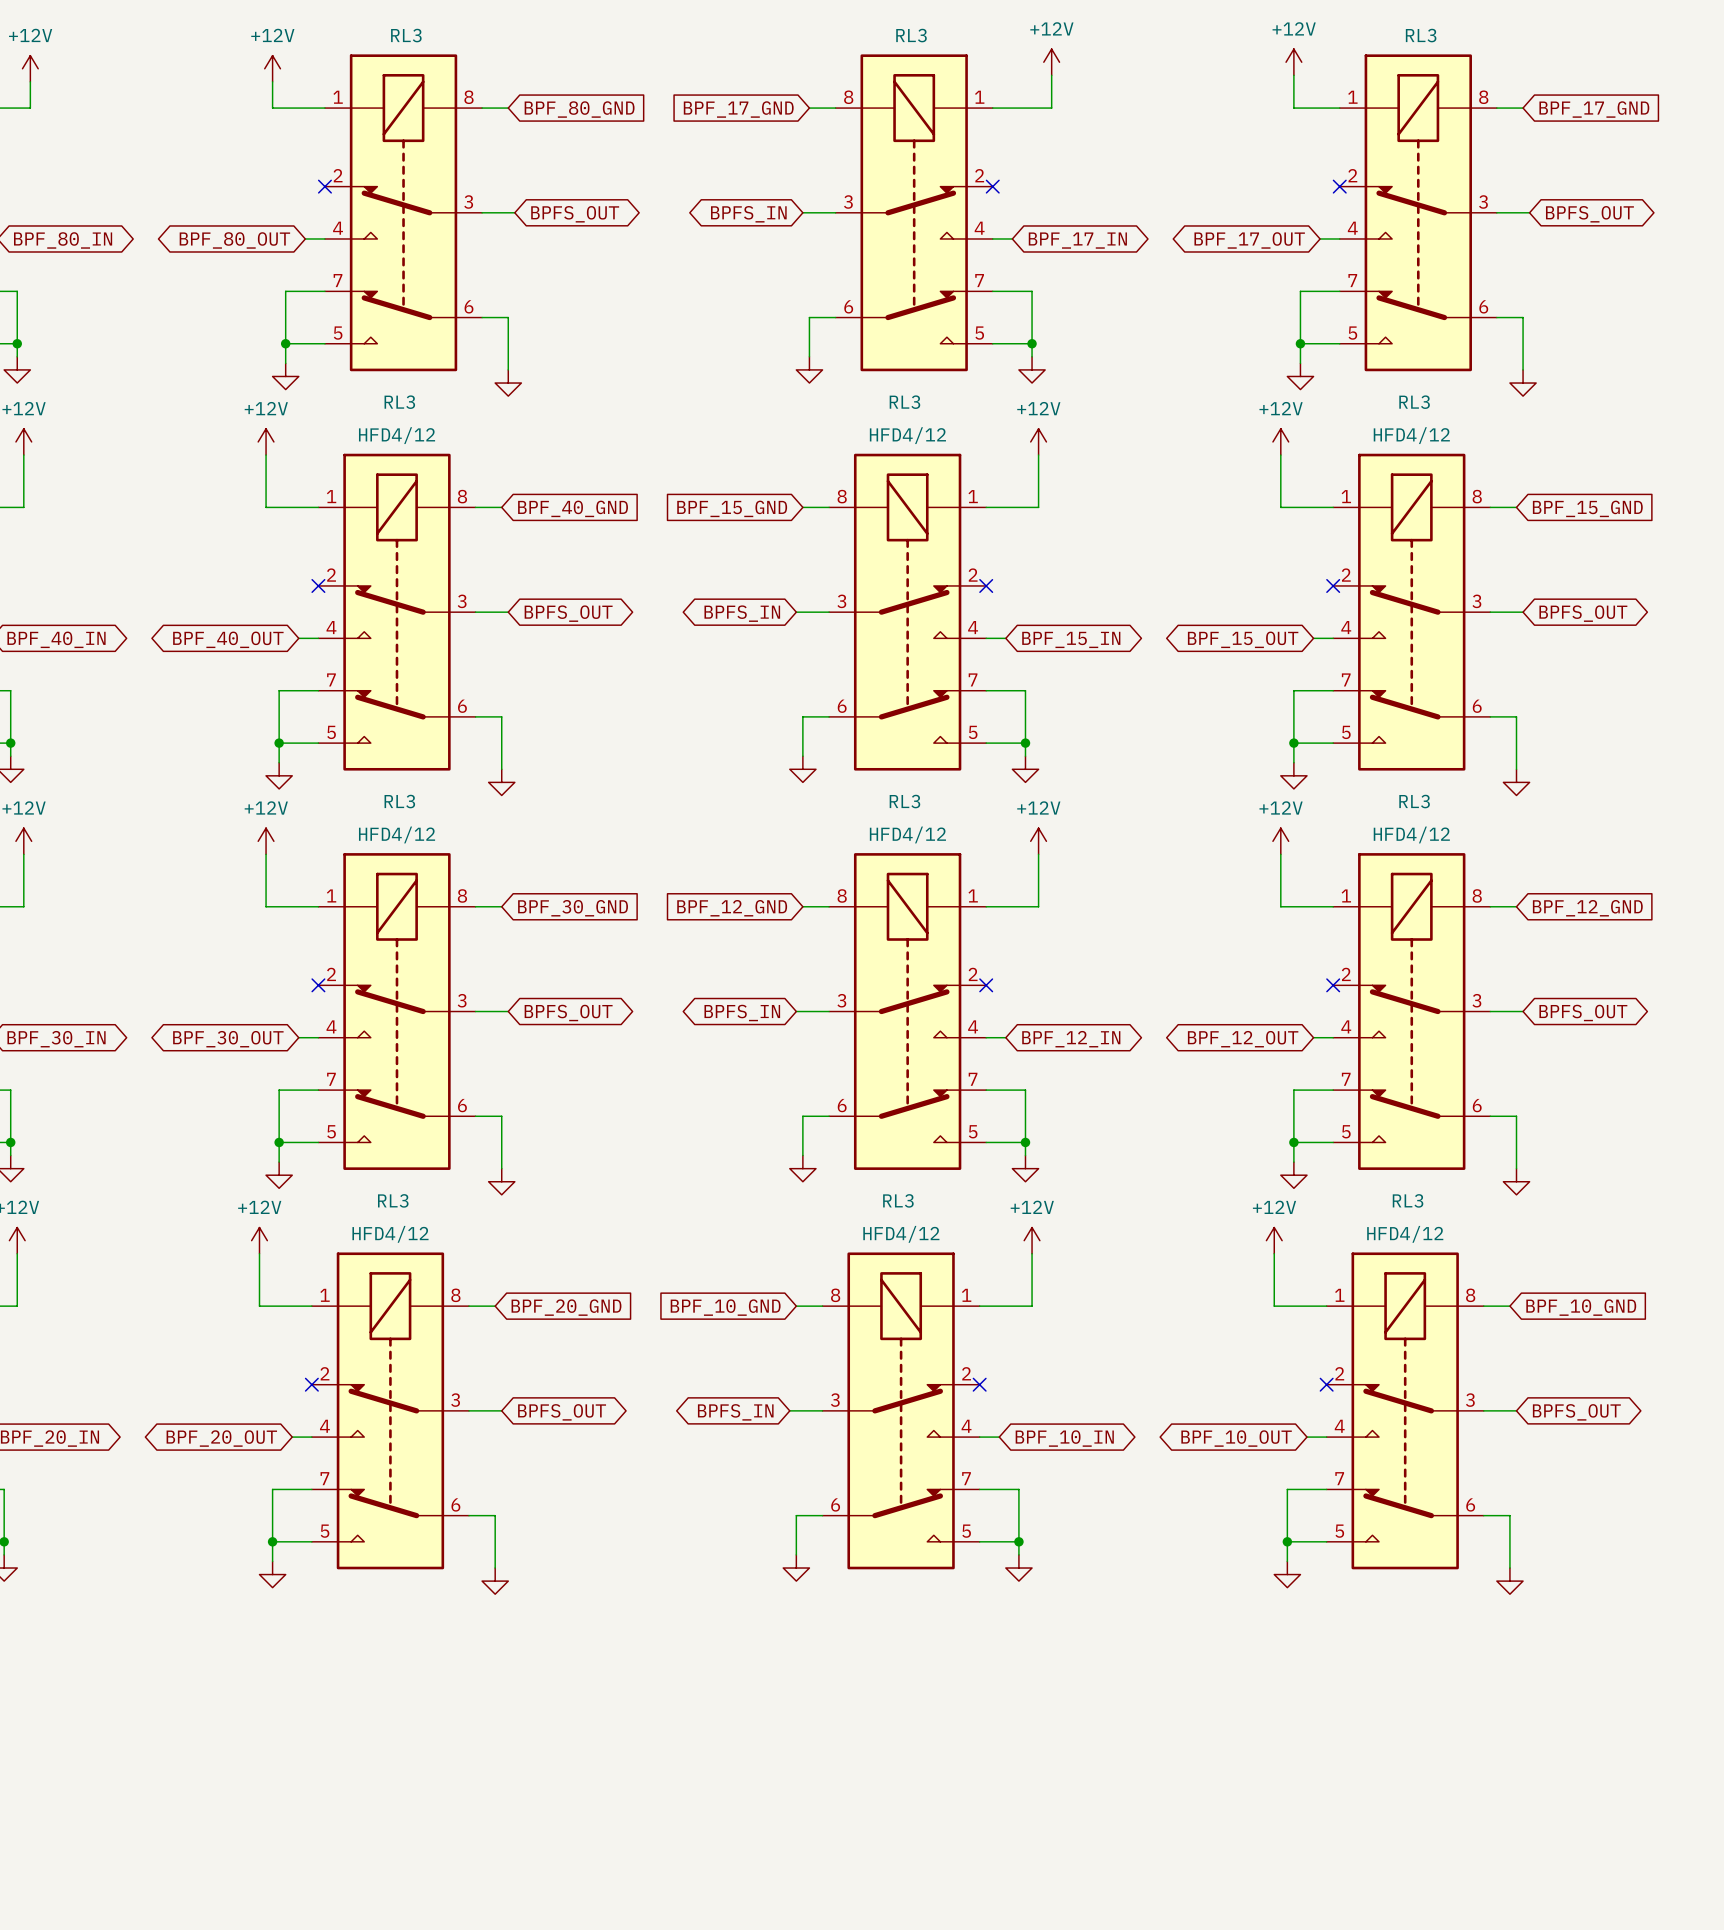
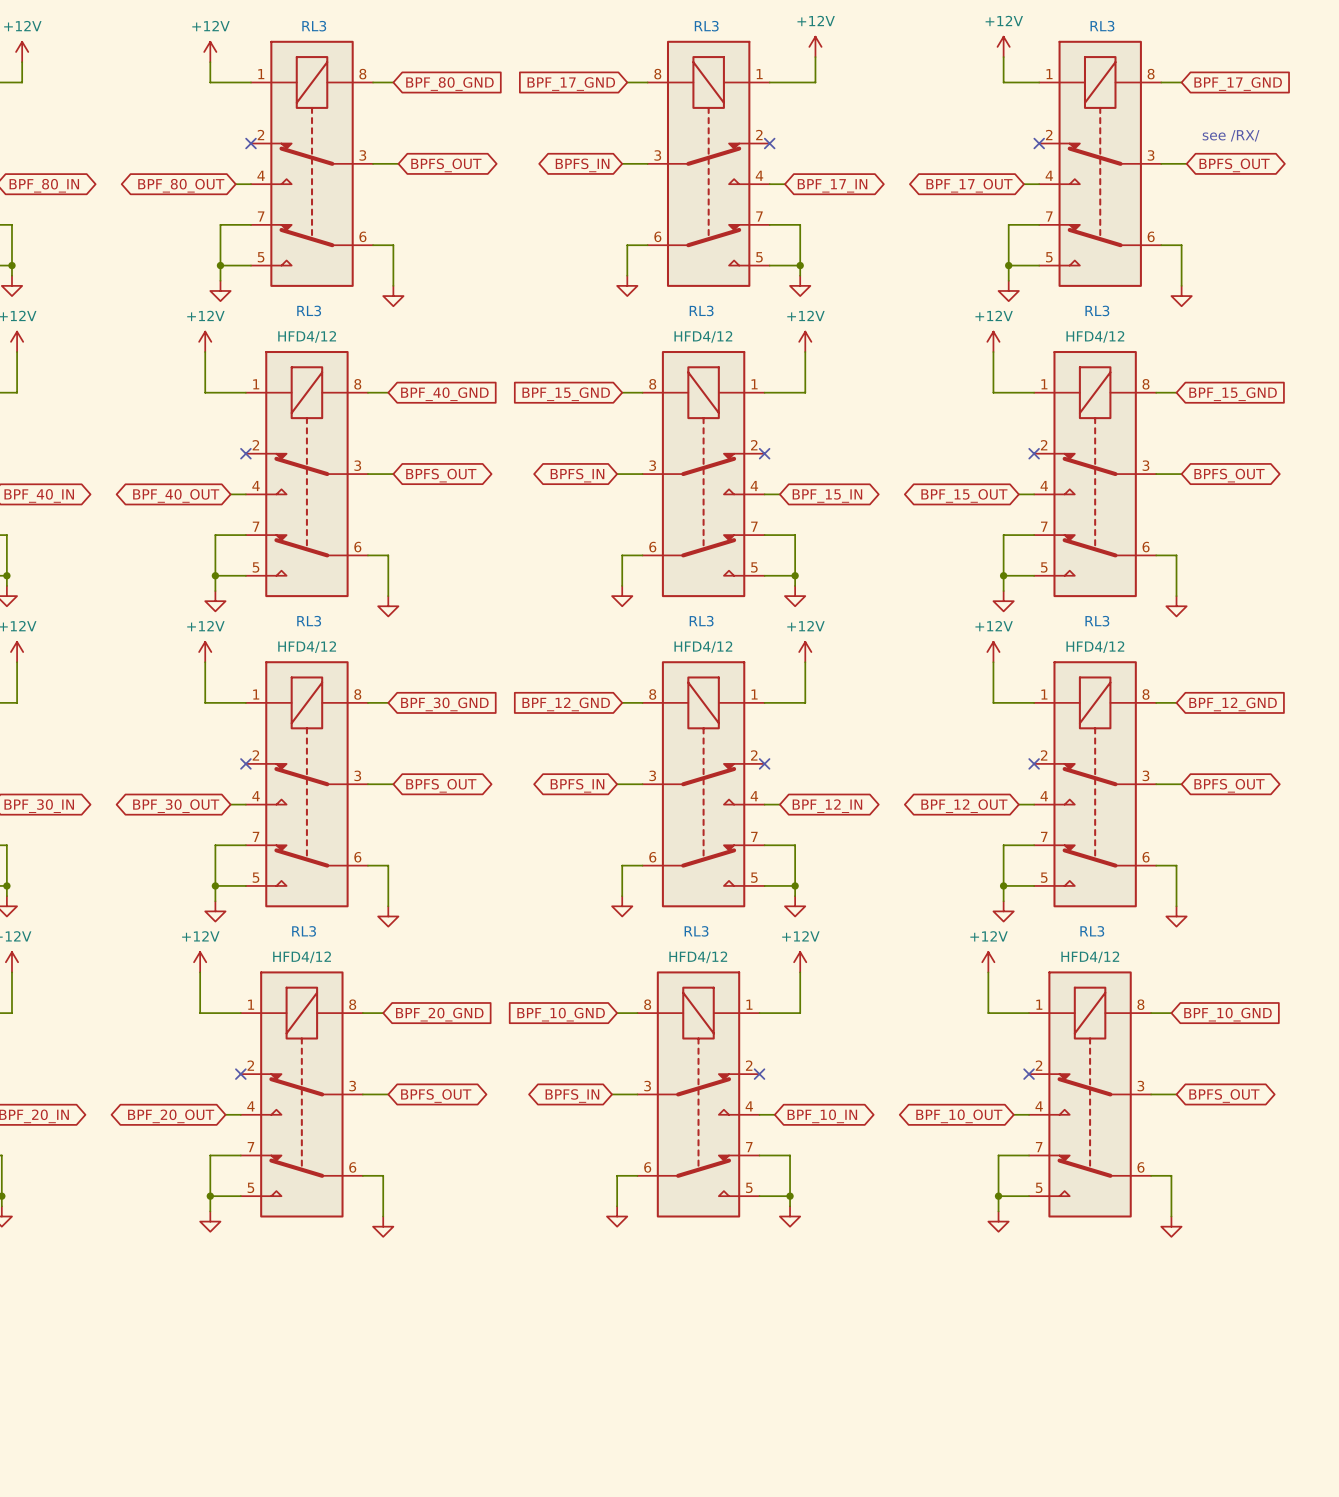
text: none -> see /RX/ (1231, 135)

